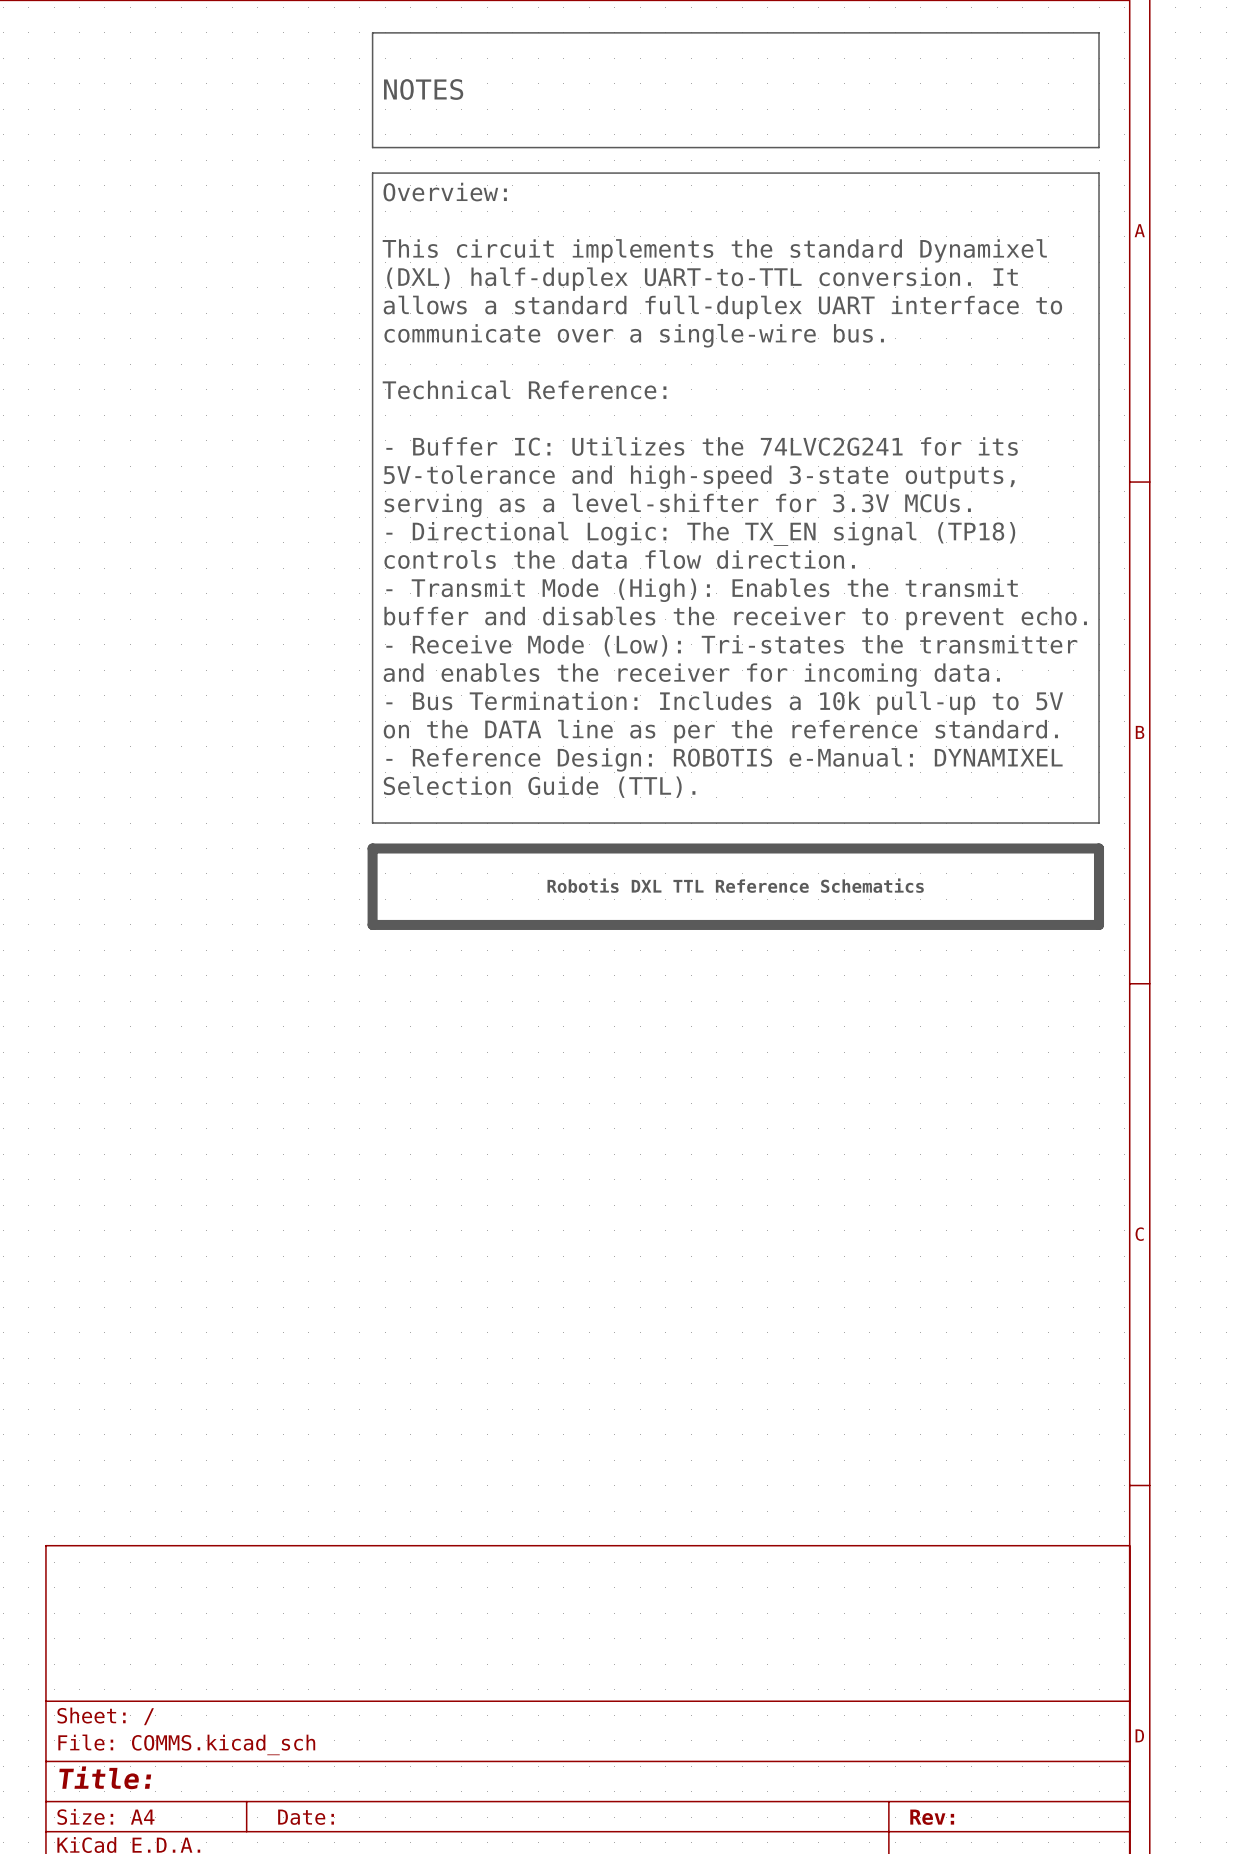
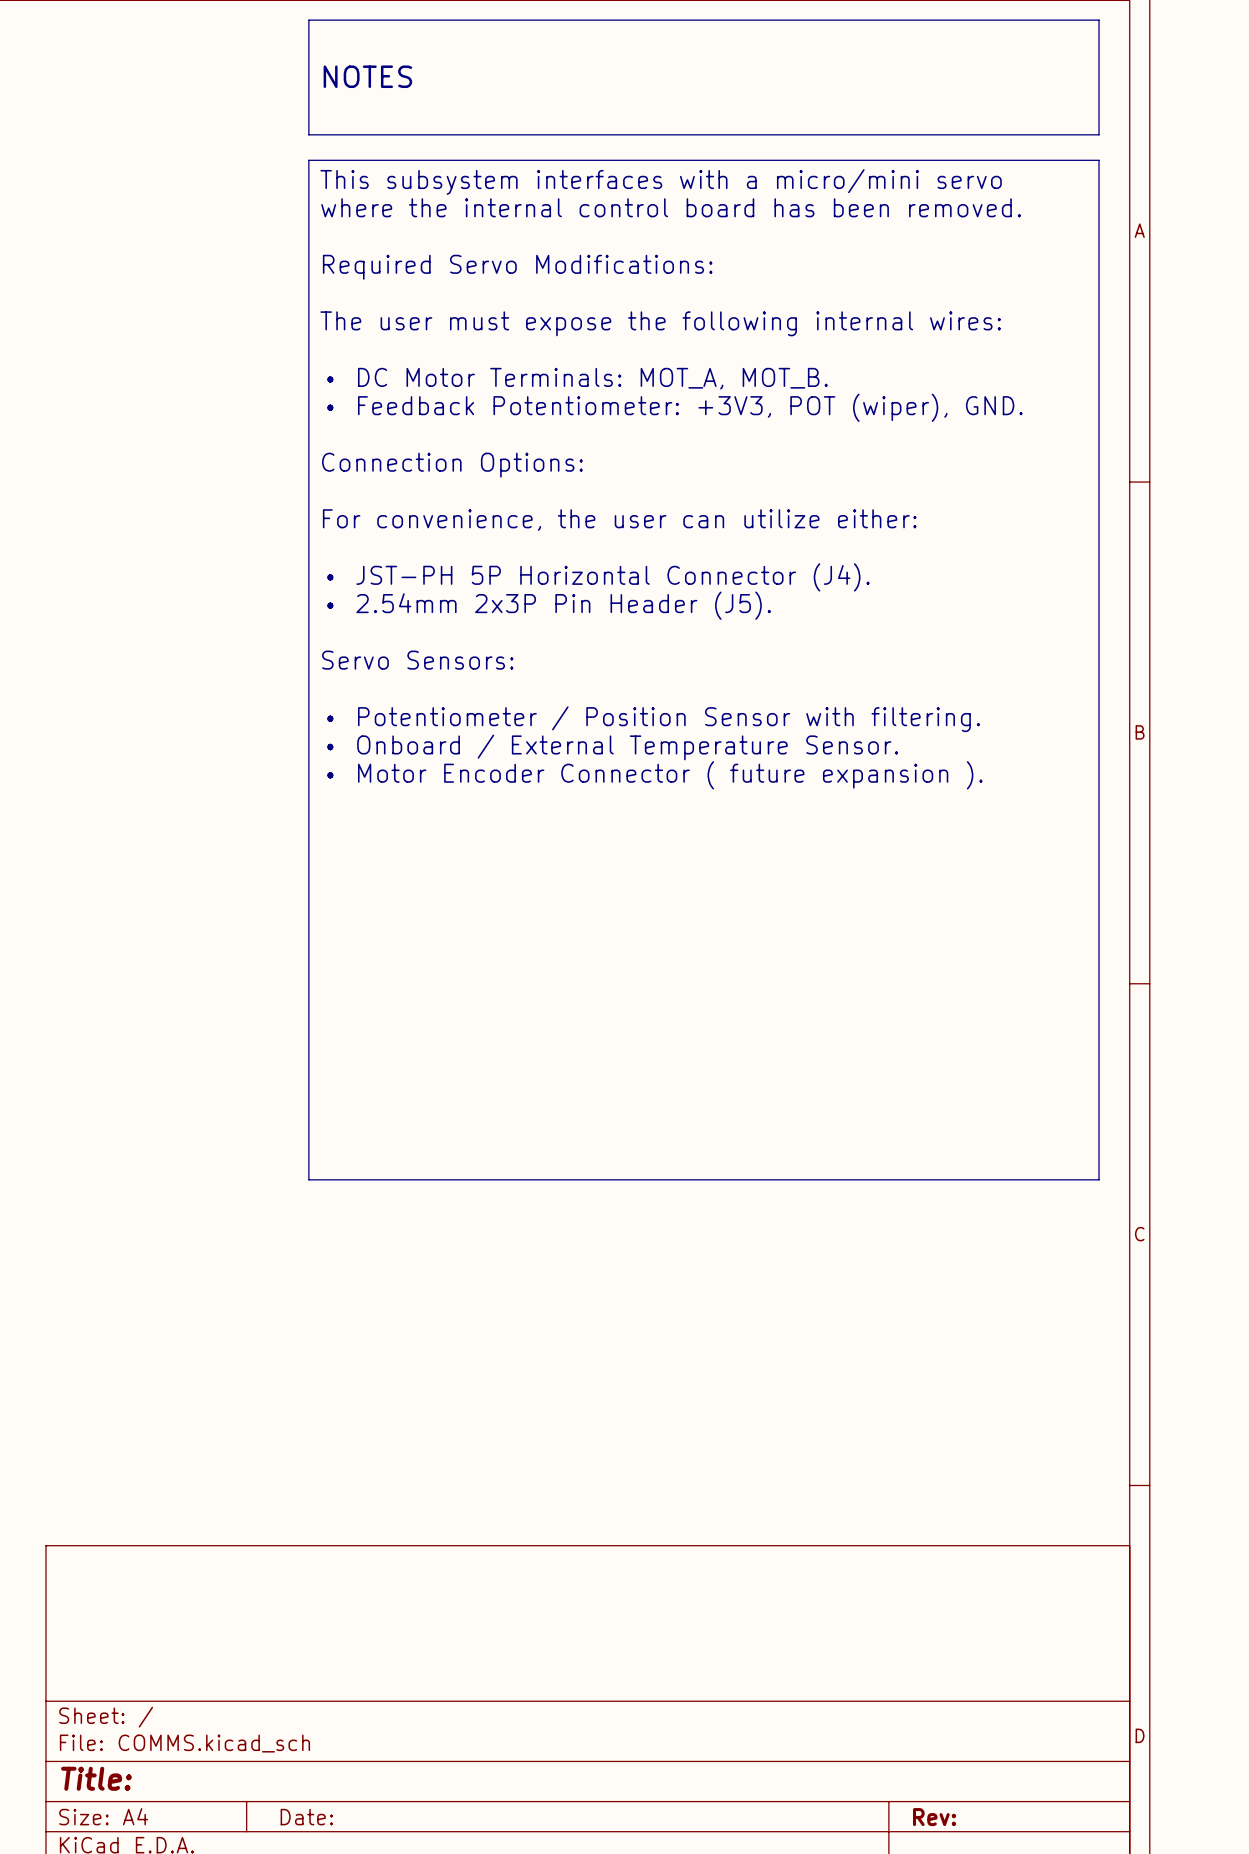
line: (1099, 32) (372, 32) (372, 147) (1099, 147) (1099, 134) -> (1099, 32) (1099, 20) (308, 20) (308, 134) (1099, 134)
text position: NOTES (423, 89) -> NOTES (367, 76)
line: (1099, 173) (372, 173) (372, 823) (1099, 823) -> (1099, 173) (1099, 160) (308, 160) (308, 1179) (1099, 1179) (1099, 924)
text: none -> This subsystem interfaces with a micro/mini servo (661, 182)
text: Overview: (445, 192) -> none
text: none -> where the internal control board has been removed. (671, 207)
text: This circuit implements the standard Dynamixel (714, 250) -> none
text: none -> Required Servo Modifications: (517, 267)
text: (DXL) half-duplex UART-to-TTL conversion. It (702, 279) -> none
text: allows a standard full-duplex UART interface to (722, 307) -> none
text: none -> The user must expose the following internal wires: (660, 323)
text: communicate over a single-wire bus. (634, 335) -> none
text: none -> • DC Motor Terminals: MOT_A, MOT_B. (577, 378)
text: Technical Reference: (524, 389) -> none
text: none -> • Feedback Potentiometer: +3V3, POT (wiper), GND. (674, 407)
text: - Buffer IC: Utilizes the 74LVC2G241 for its (702, 446) -> none
text: none -> Connection Options: (452, 465)
text: 5V-tolerance and high-speed 3-state outputs, (699, 477) -> none
text: serving as a level-shifter for 3.3V MCUs. (677, 505) -> none
text: none -> For convenience, the user can utilize either: (619, 520)
text: - Directional Logic: The TX_EN signal (TP18) (700, 533) -> none
text: controls the data flow direction. (619, 559) -> none
text: none -> • JST-PH 5P Horizontal Connector (J4). (598, 577)
text: - Transmit Mode (High): Enables the transmit (702, 590) -> none
text: none -> • 2.54mm 2x3P Pin Header (J5). (549, 605)
text: buffer and disables the receiver to prevent echo. (735, 618) -> none
text: - Receive Mode (Low): Tri-states the transmitter (731, 645) -> none
text: none -> Servo Sensors: (417, 660)
text: and enables the receiver for incoming data. (691, 675) -> none
text: - Bus Termination: Includes a 10k pull-up to 5V (724, 703) -> none
text: none -> • Potentiometer / Position Sensor with filtering. (653, 719)
text: on the DATA line as per the reference standard. (720, 731) -> none
text: none -> • Onboard / External Temperature Sensor. (612, 747)
text: - Reference Design: ROBOTIS e-Manual: DYNAMIXEL (724, 759) -> none
text: none -> • Motor Encoder Connector ( future expansion ). (654, 775)
text: Selection Guide (TTL). (539, 787) -> none
line: (1099, 848) (372, 848) (372, 924) (1099, 924) -> (1099, 848) (1099, 823)
line width: thick (1099, 848) (1099, 924) -> thin (1099, 848) (1099, 924)
text: Robotis DXL TTL Reference Schematics (735, 885) -> none

